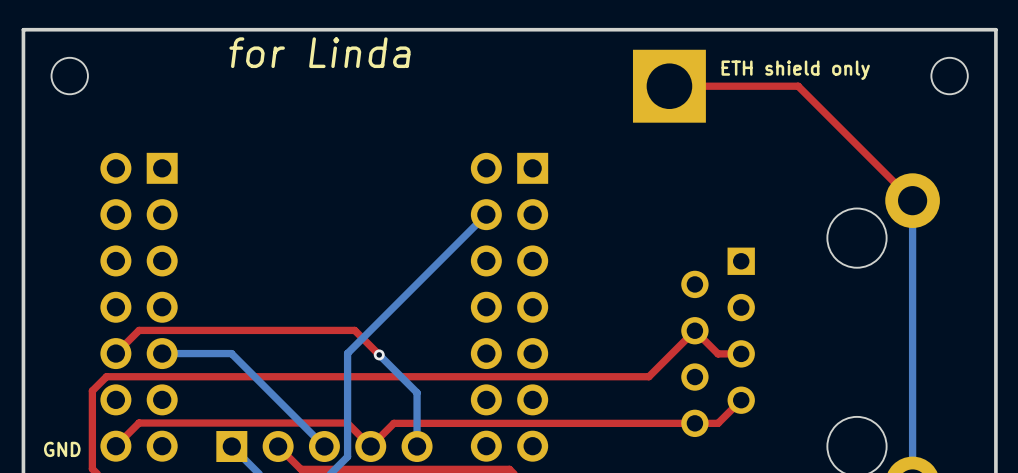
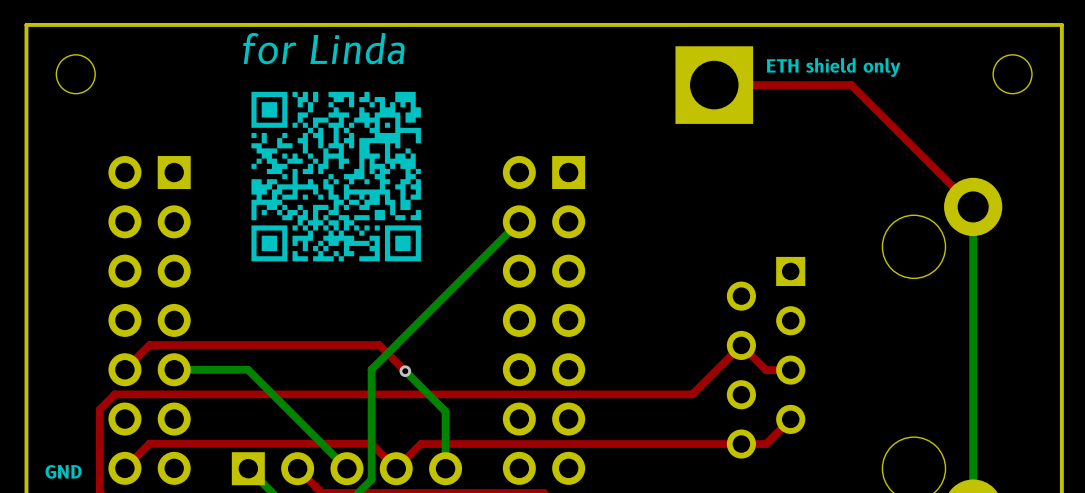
drawing: none -> [251, 91, 421, 262]

